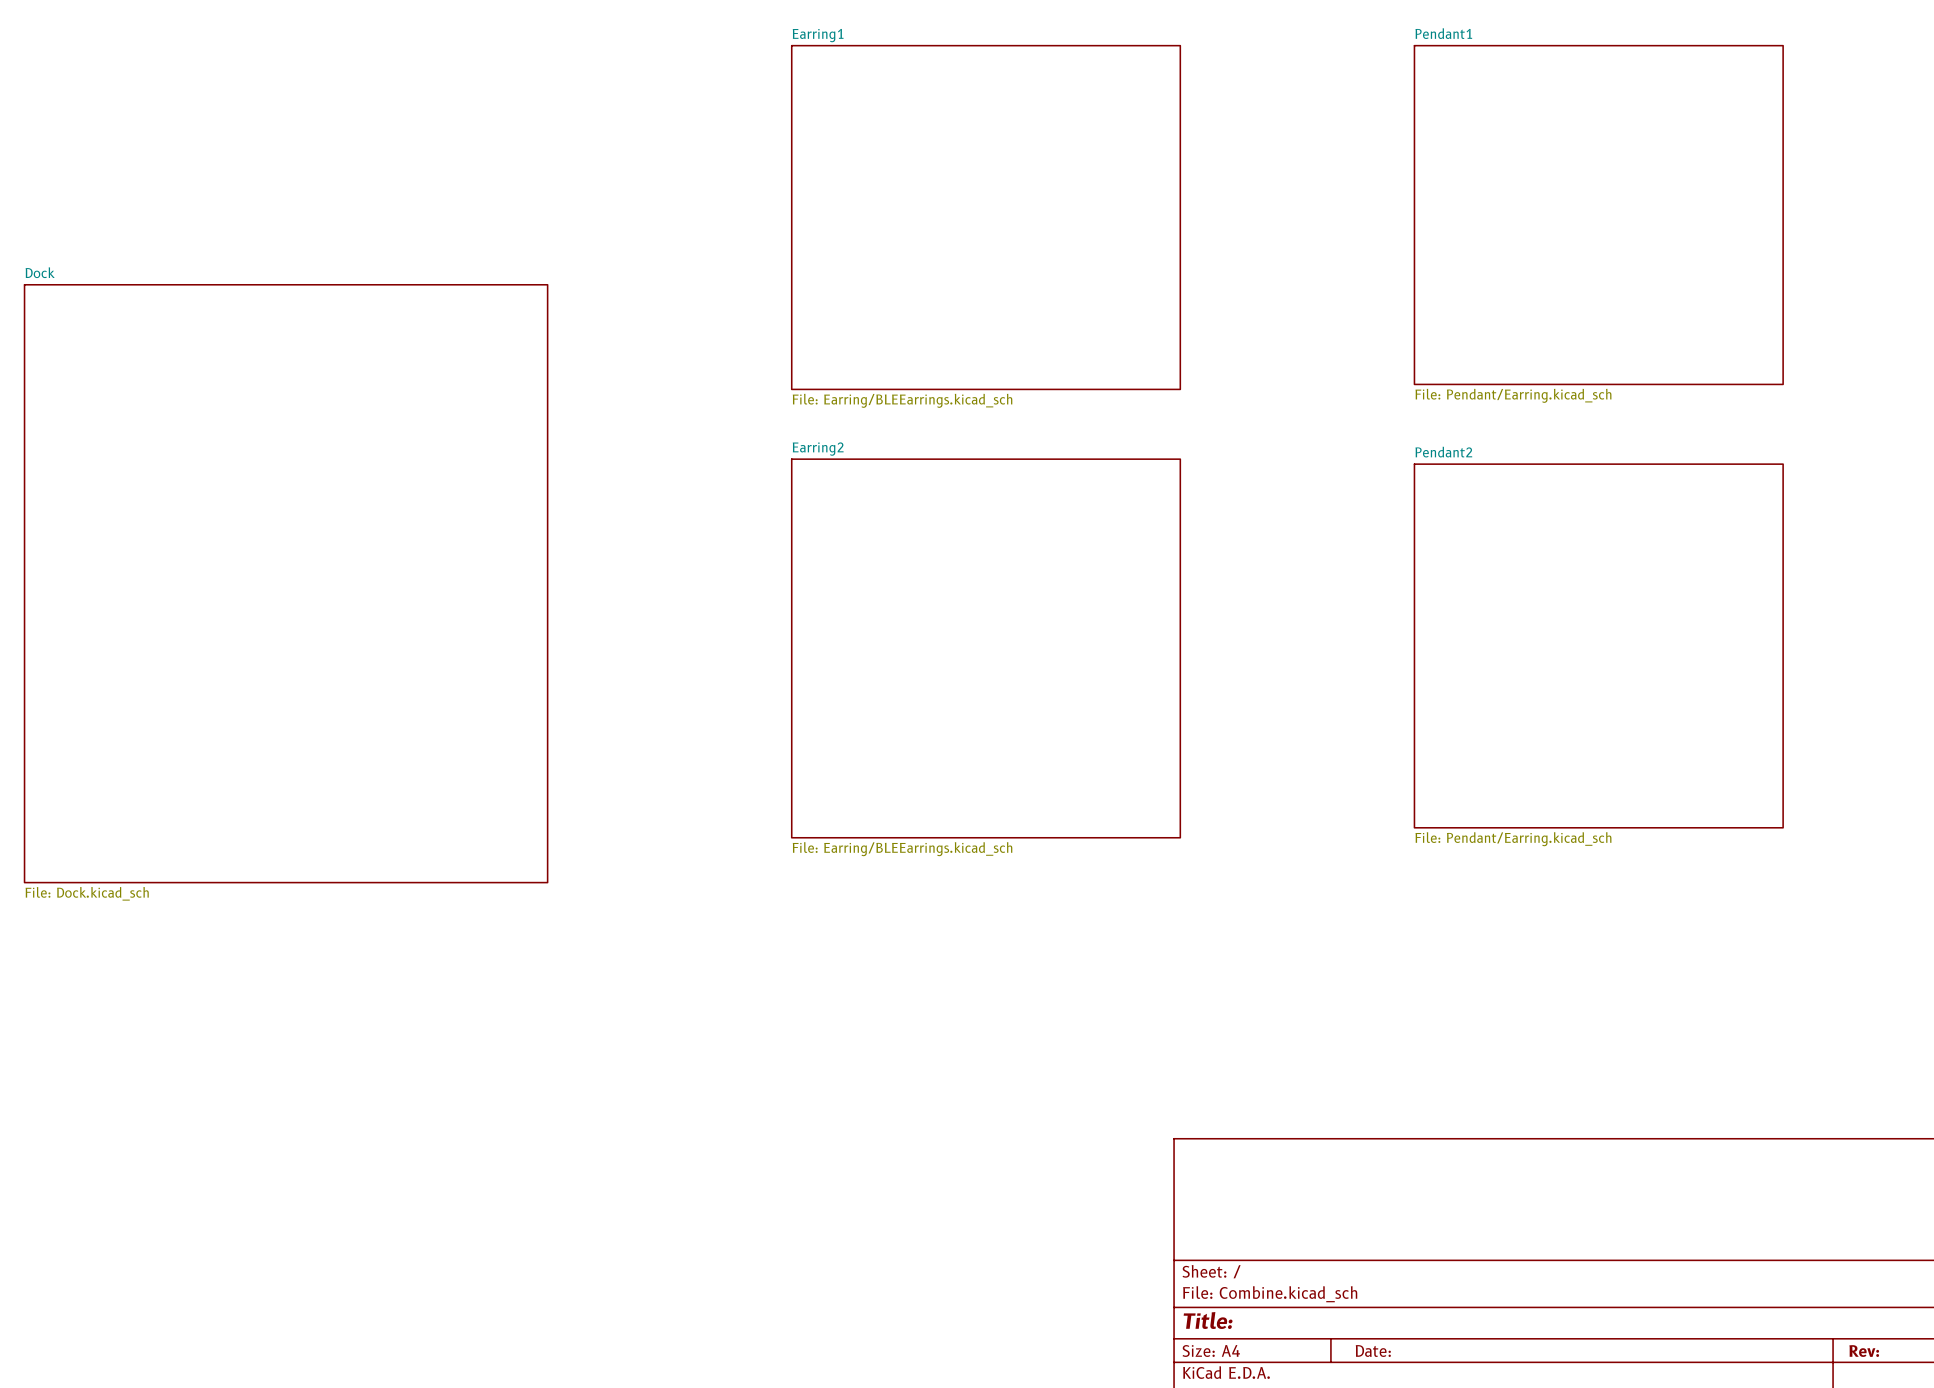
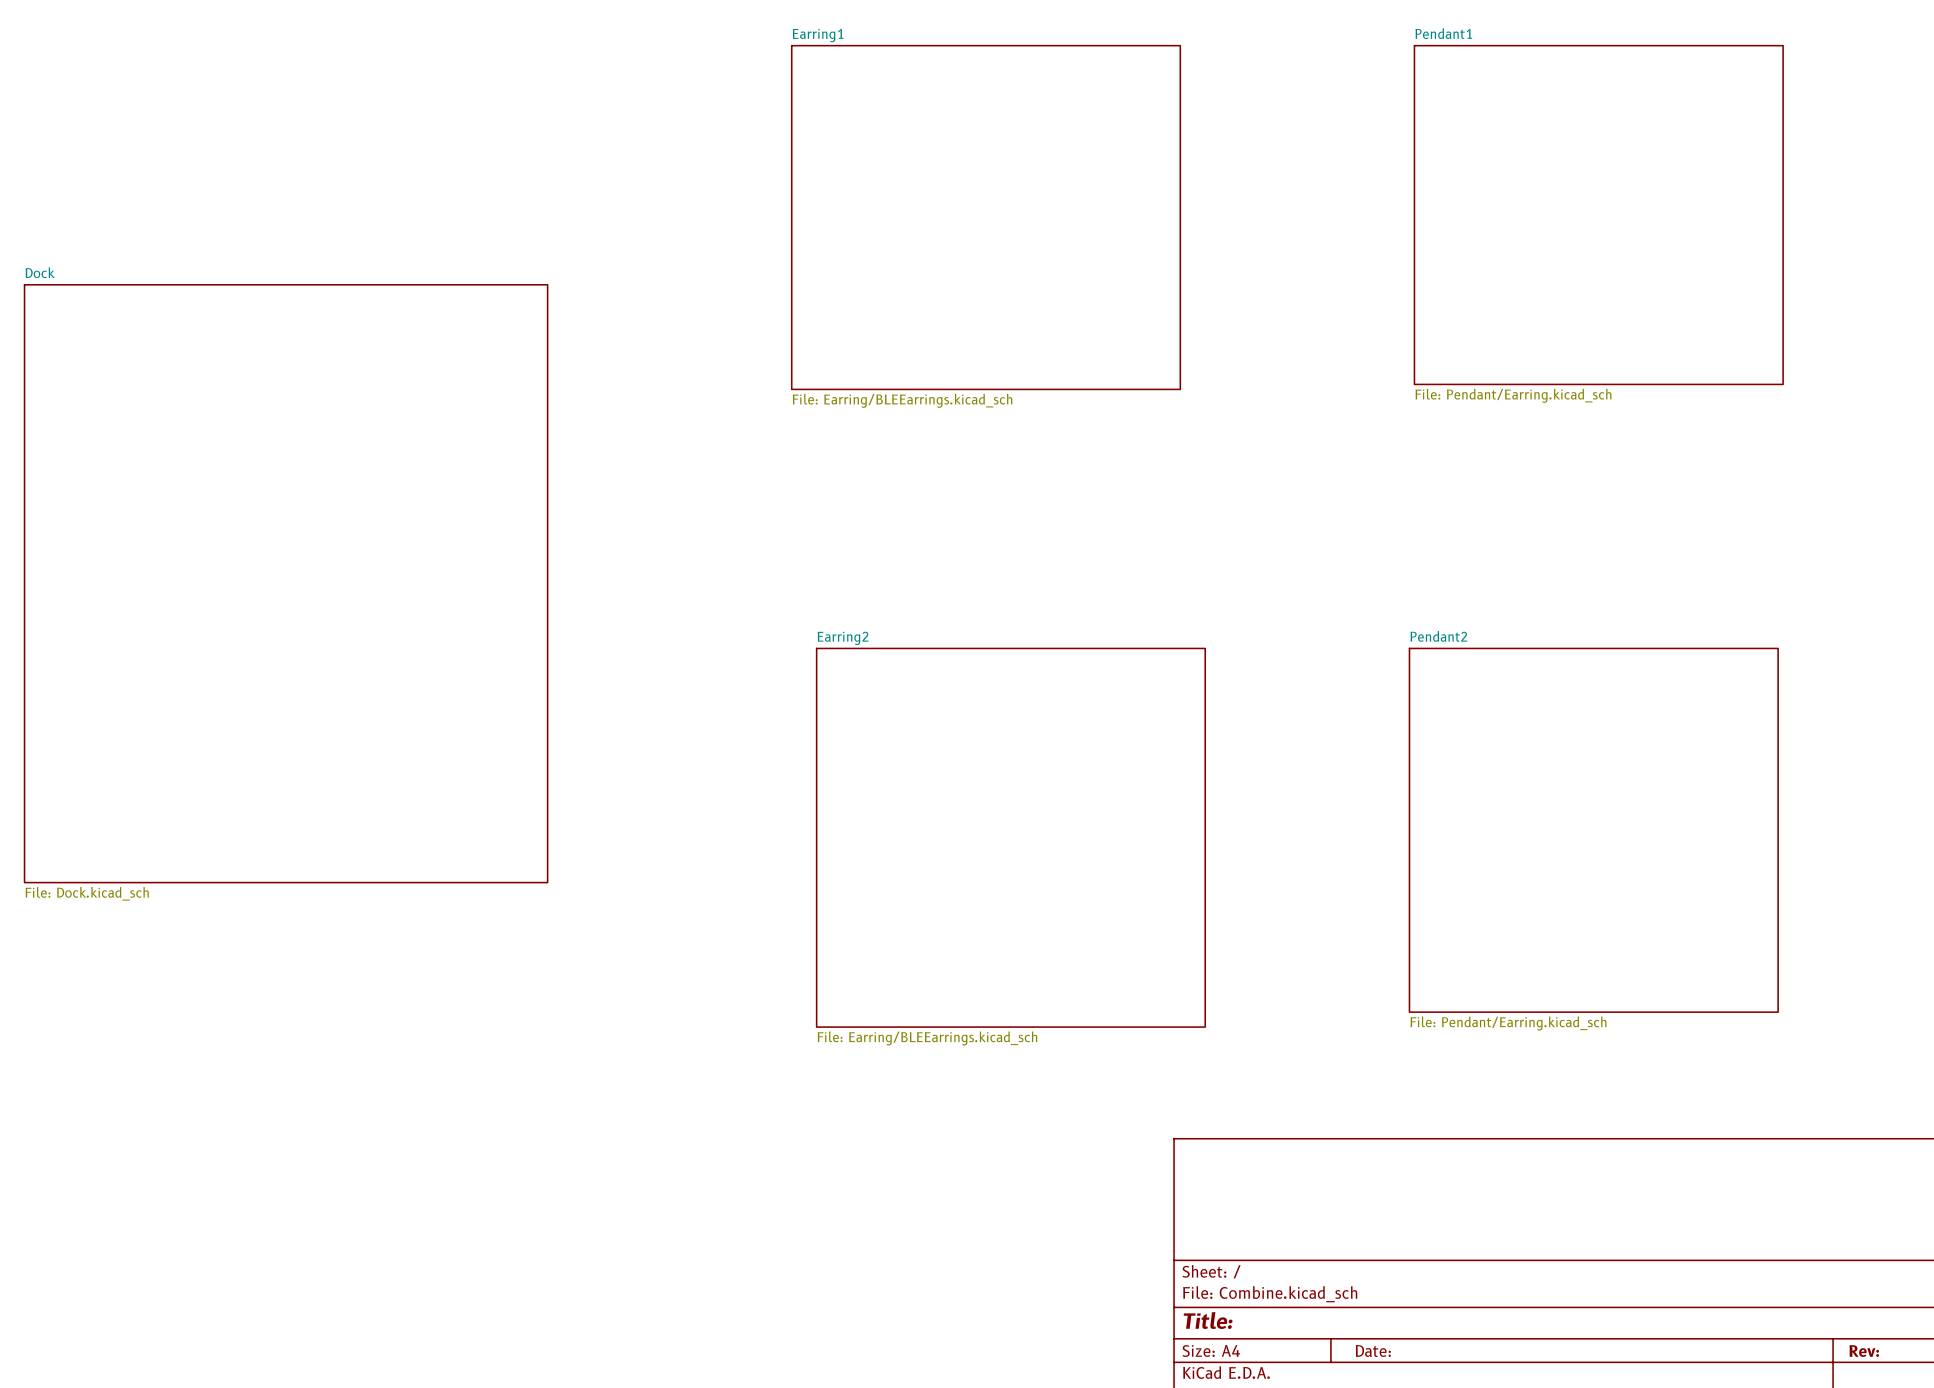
sheet Pendant2 position: (1598, 645) -> (1593, 830)
sheet Earring2 position: (986, 648) -> (1010, 837)

